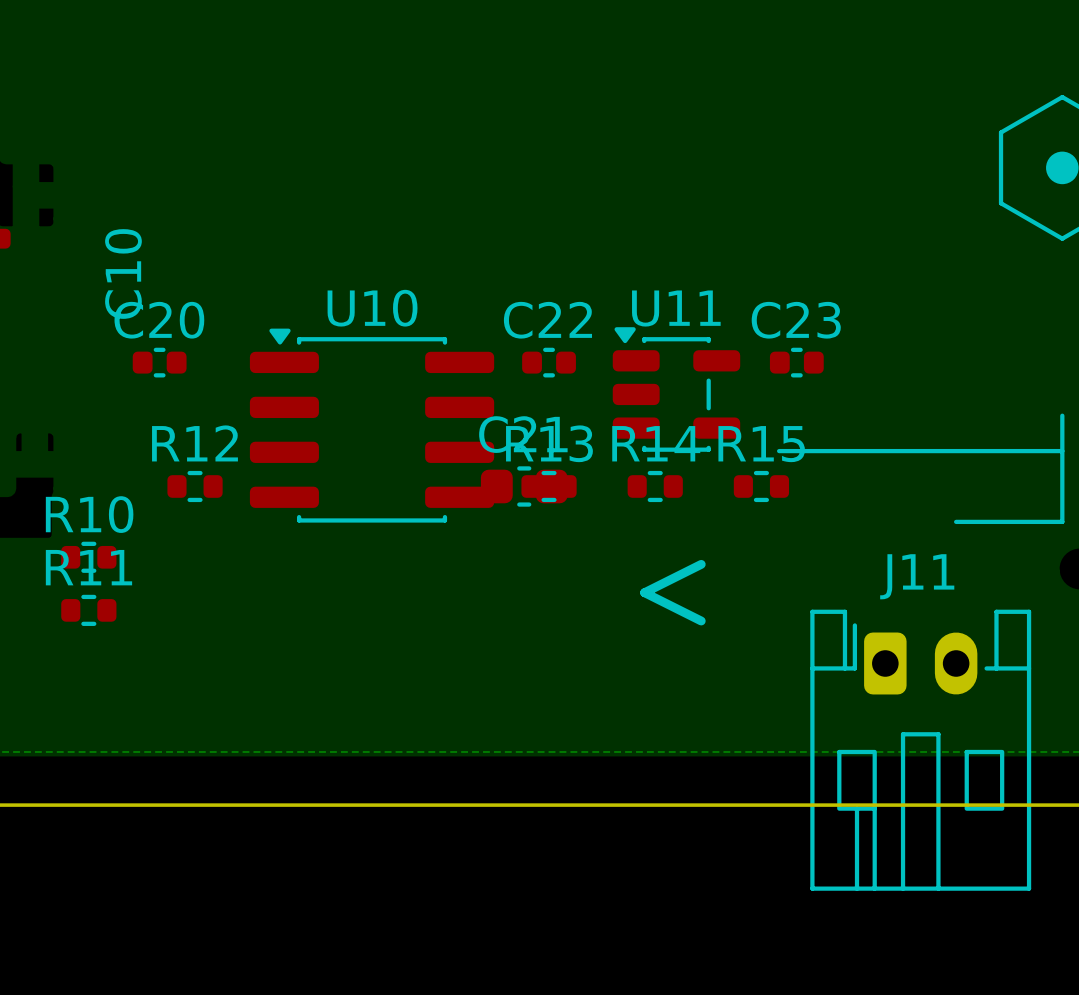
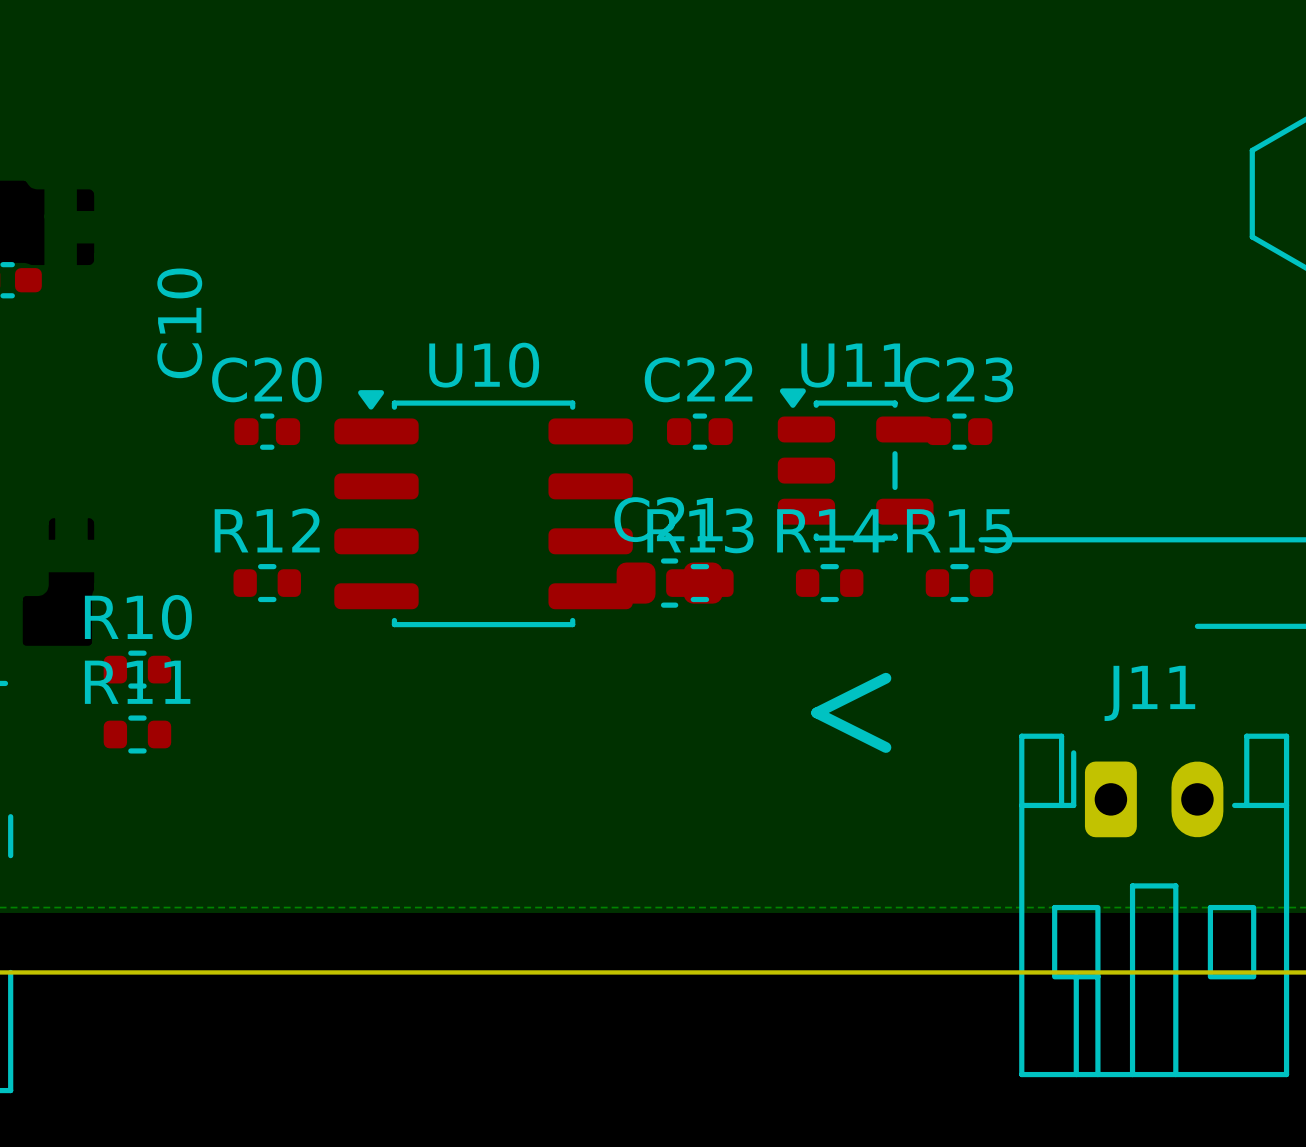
C20 position: (159, 362) -> (267, 431)
C23 position: (796, 362) -> (959, 431)

